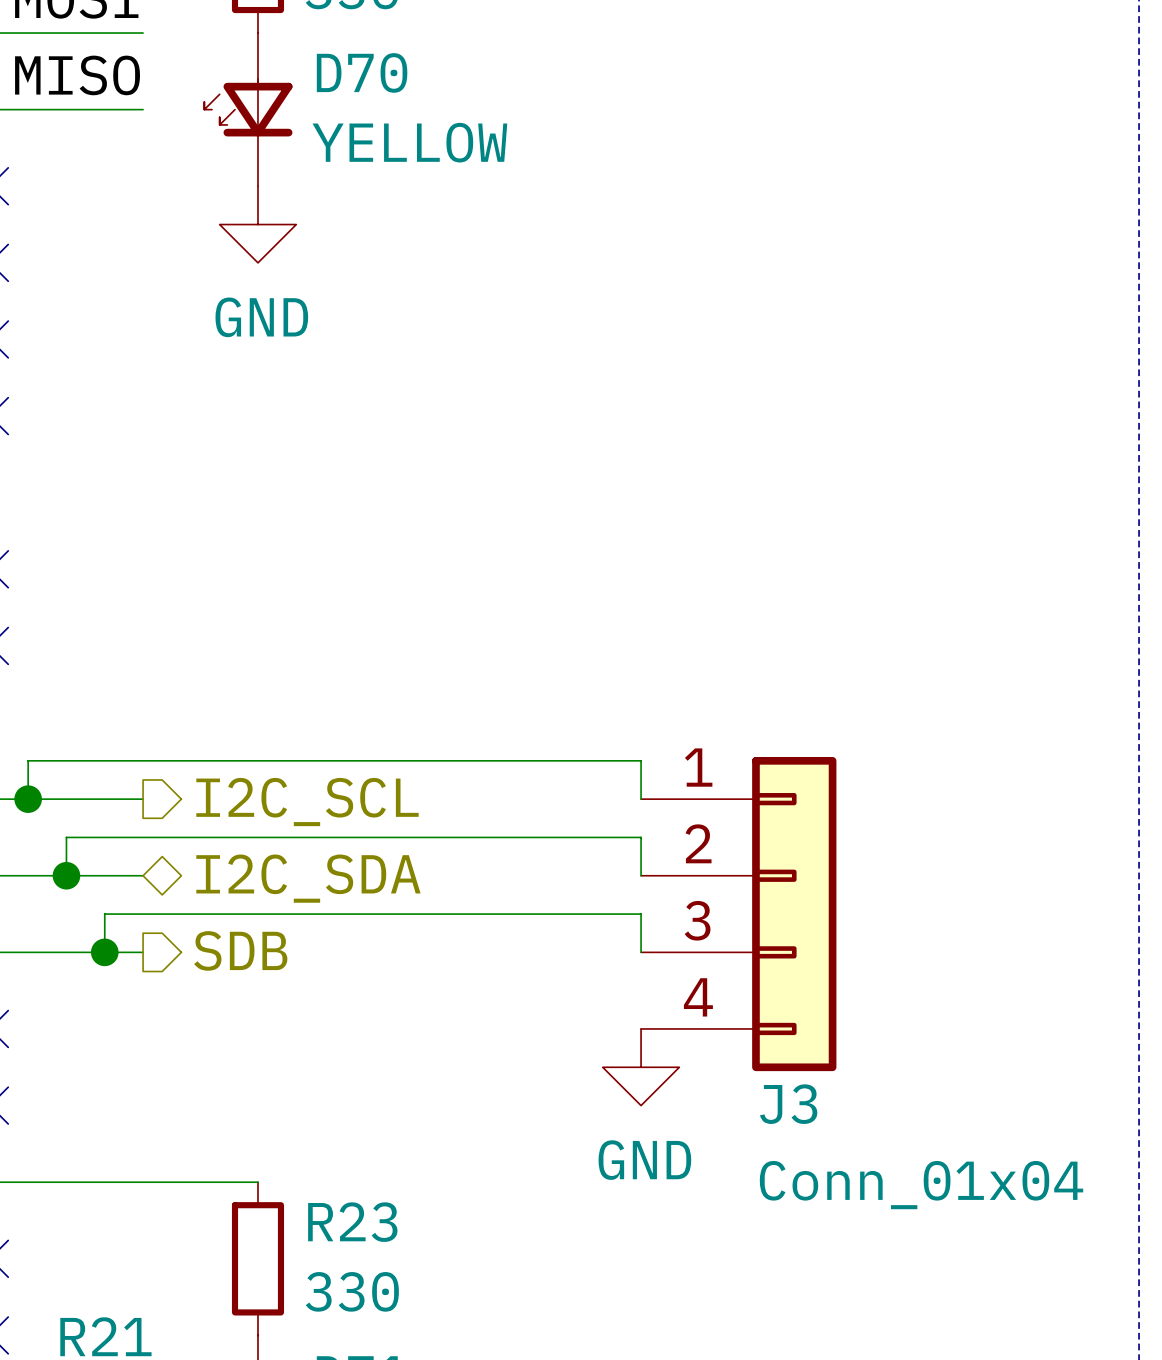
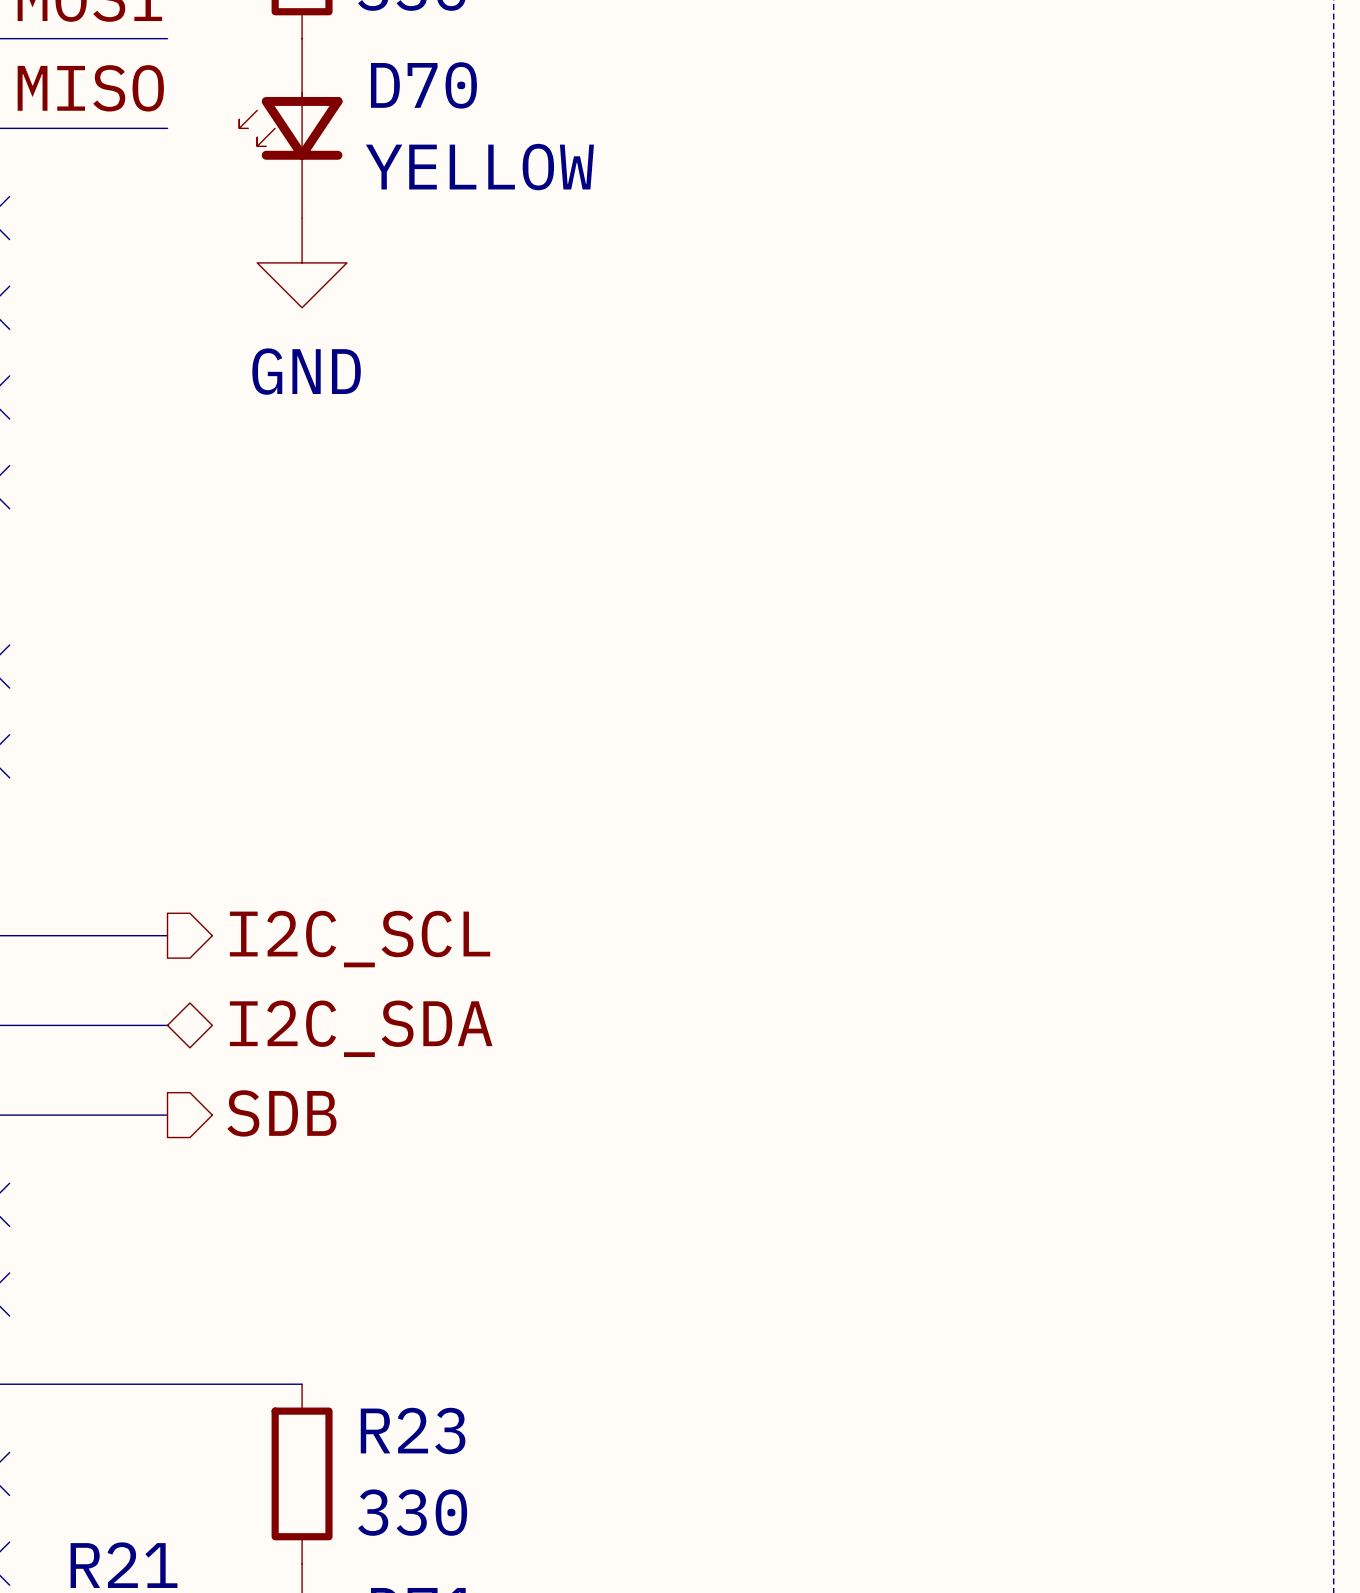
wire: (28, 799) (28, 760) (641, 760) (641, 799) -> none
junction: (28, 799) -> none
wire: (66, 875) (66, 837) (641, 837) (641, 875) -> none
junction: (66, 875) -> none
J3: Conn_01x04 (738, 914) -> none
wire: (104, 952) (104, 914) (641, 914) (641, 952) -> none
junction: (104, 952) -> none
power symbol: GND (641, 1067) -> none

